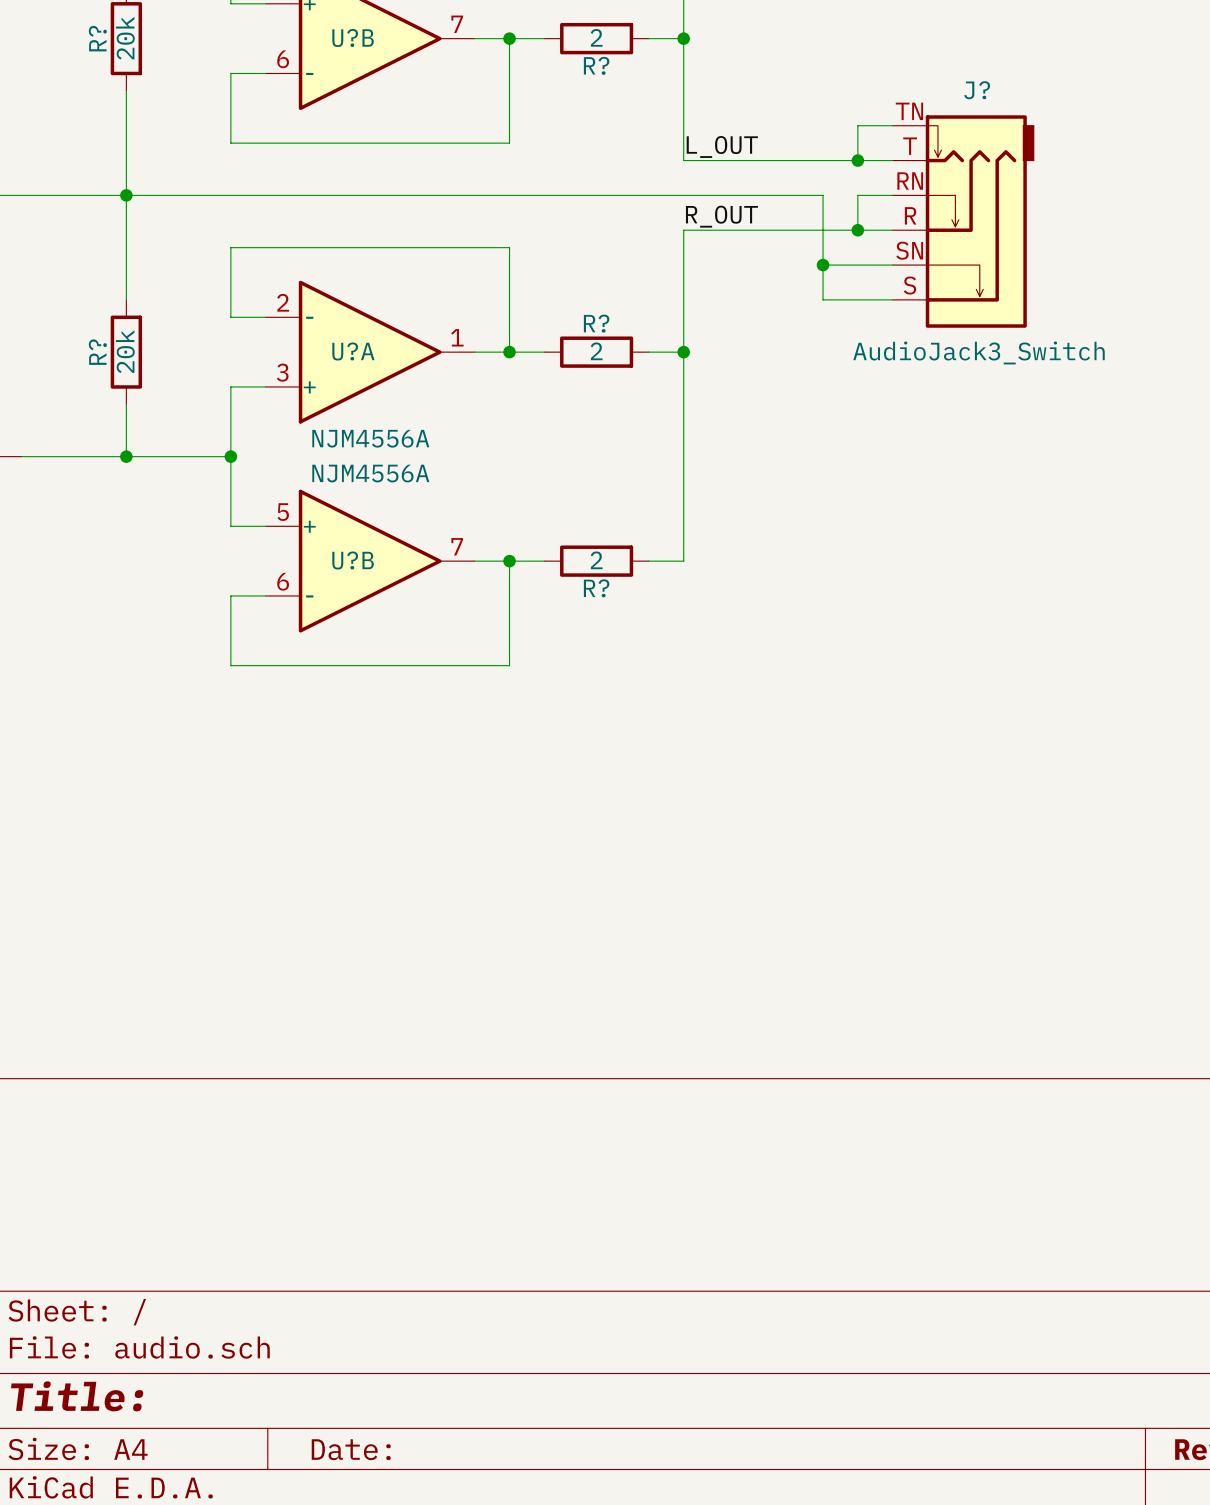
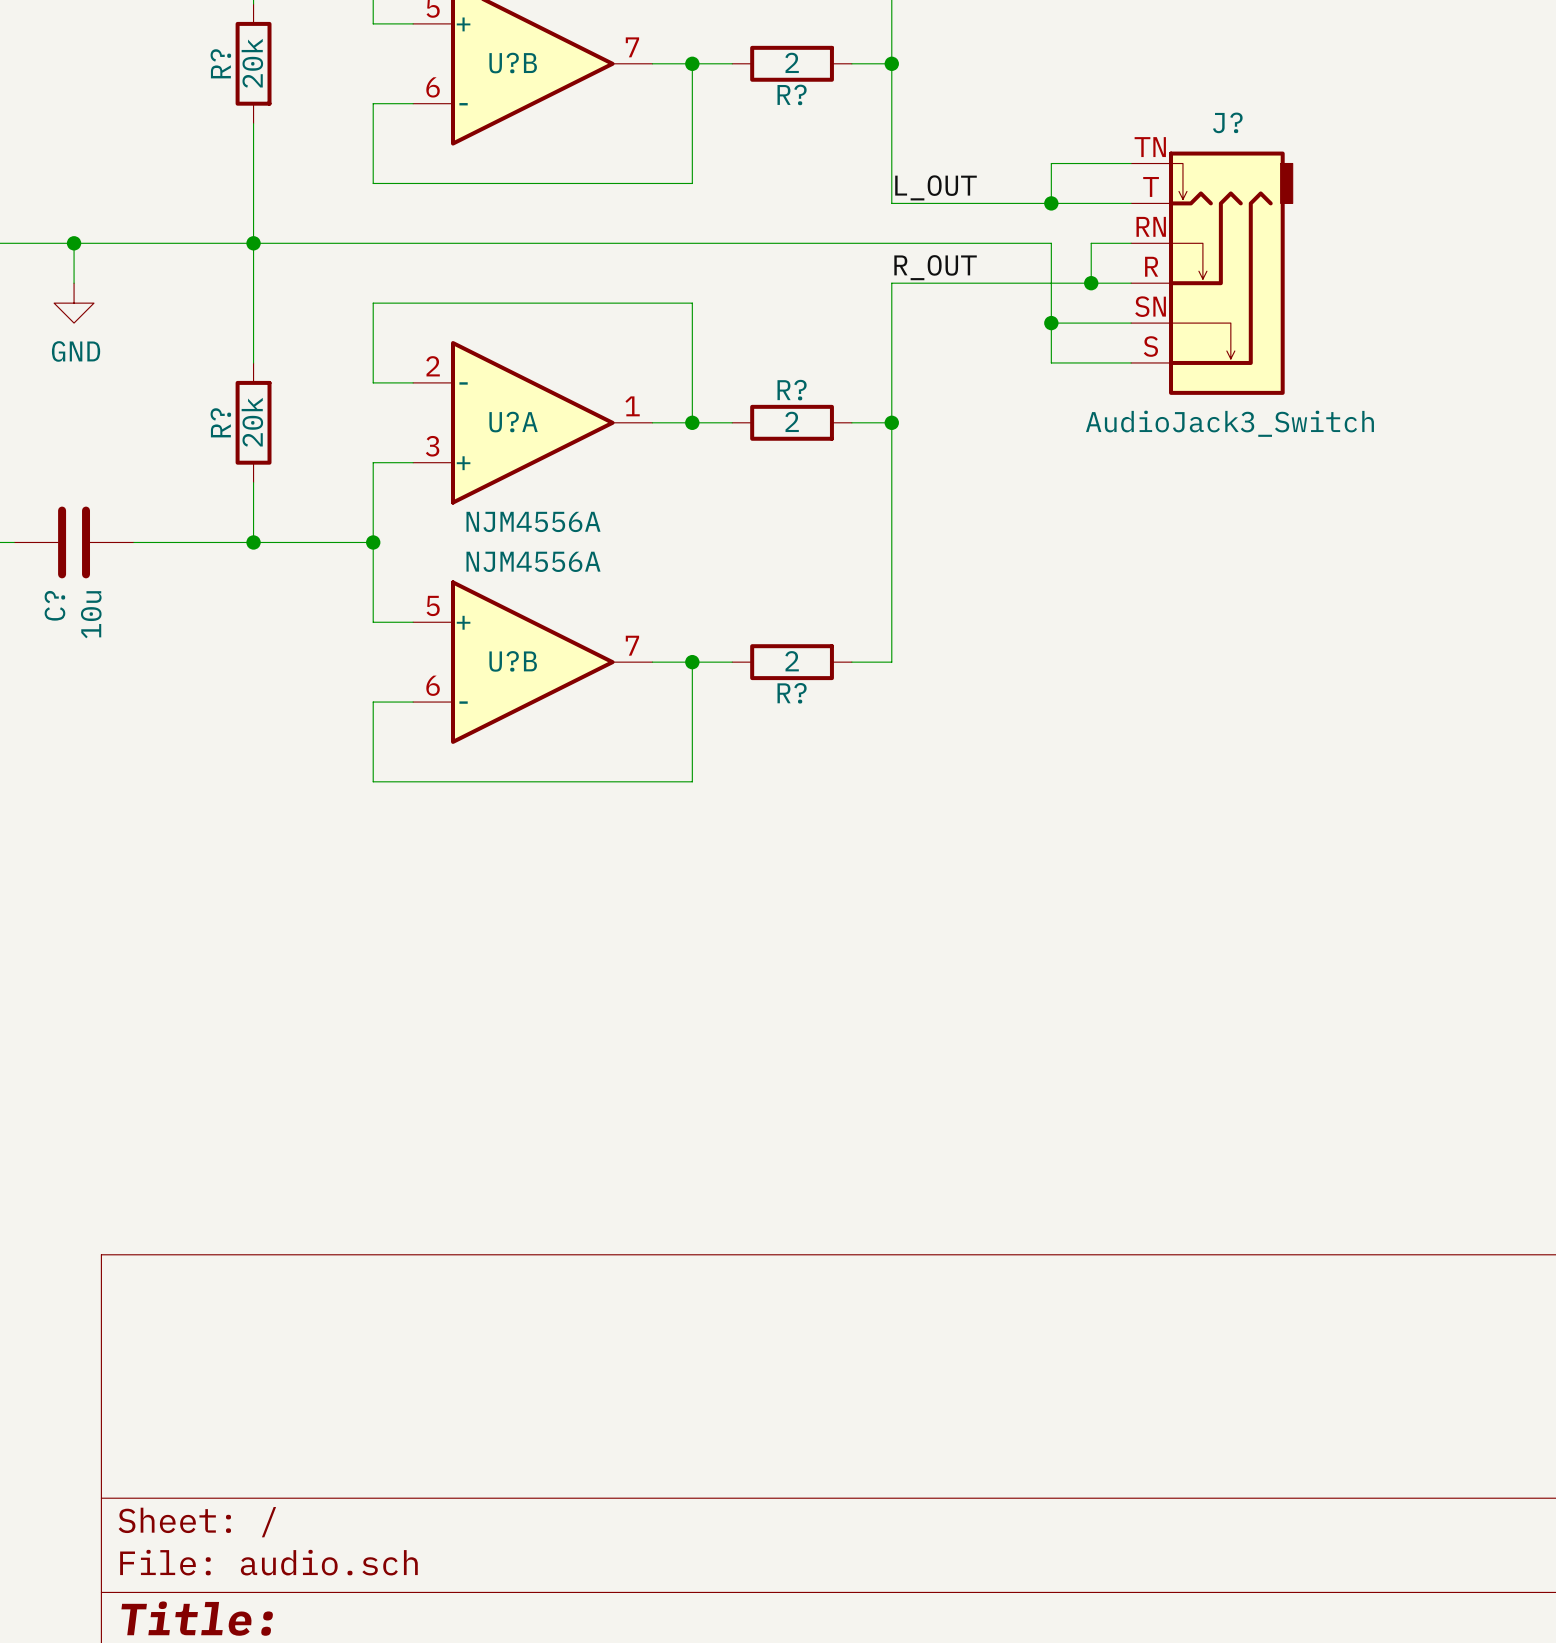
wire: (857, 125) (857, 160) -> (1091, 163) (1051, 163) (1051, 203)
junction position: (857, 160) -> (1051, 203)

